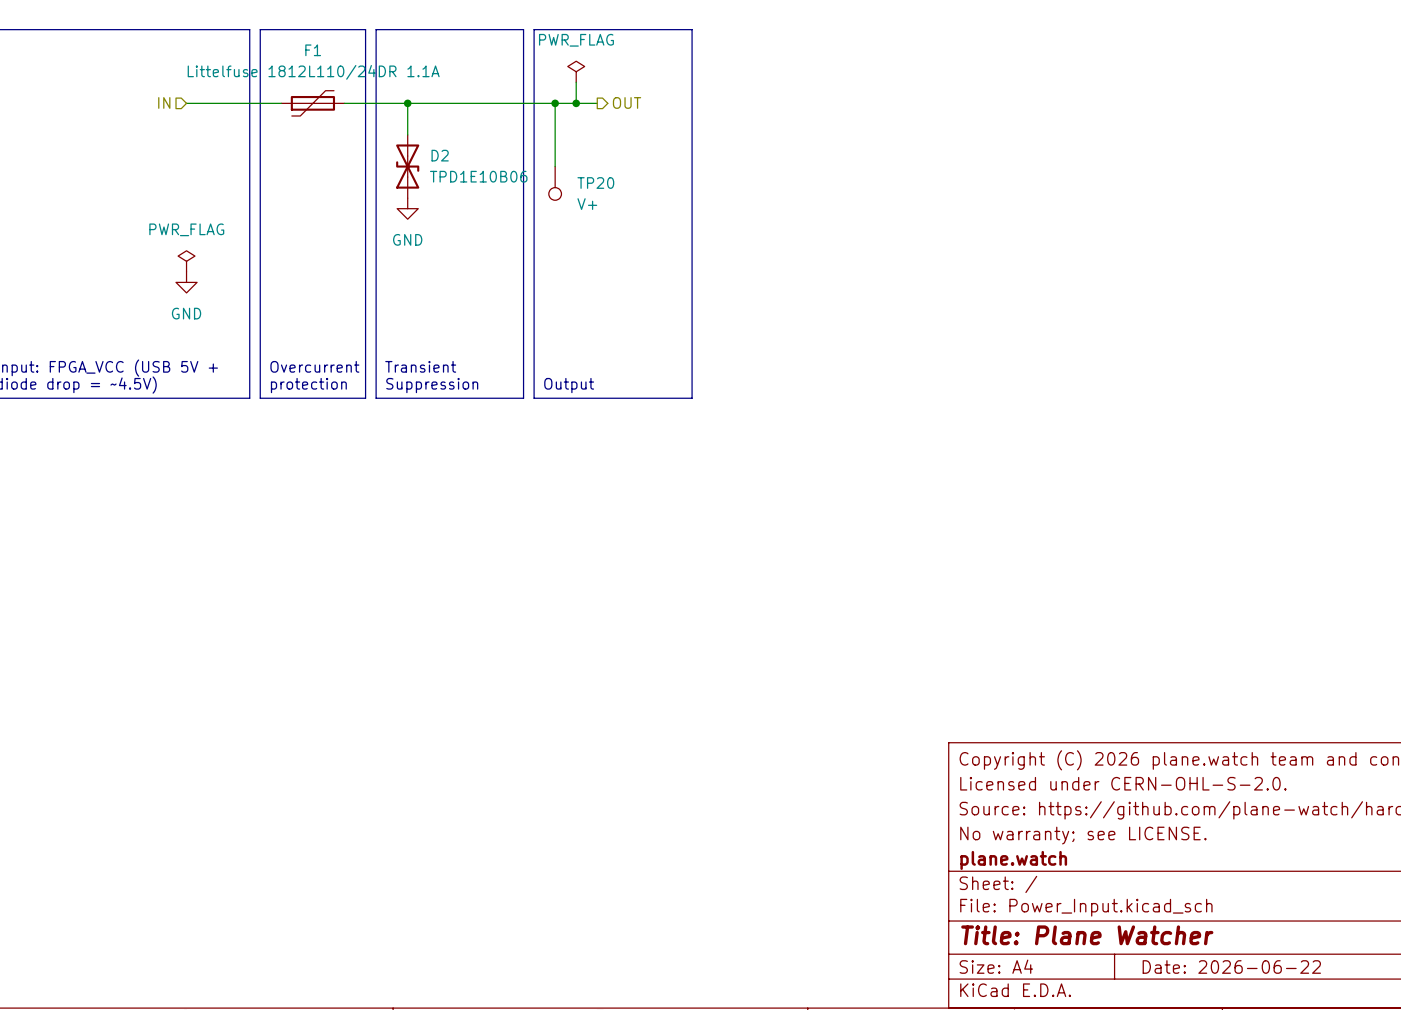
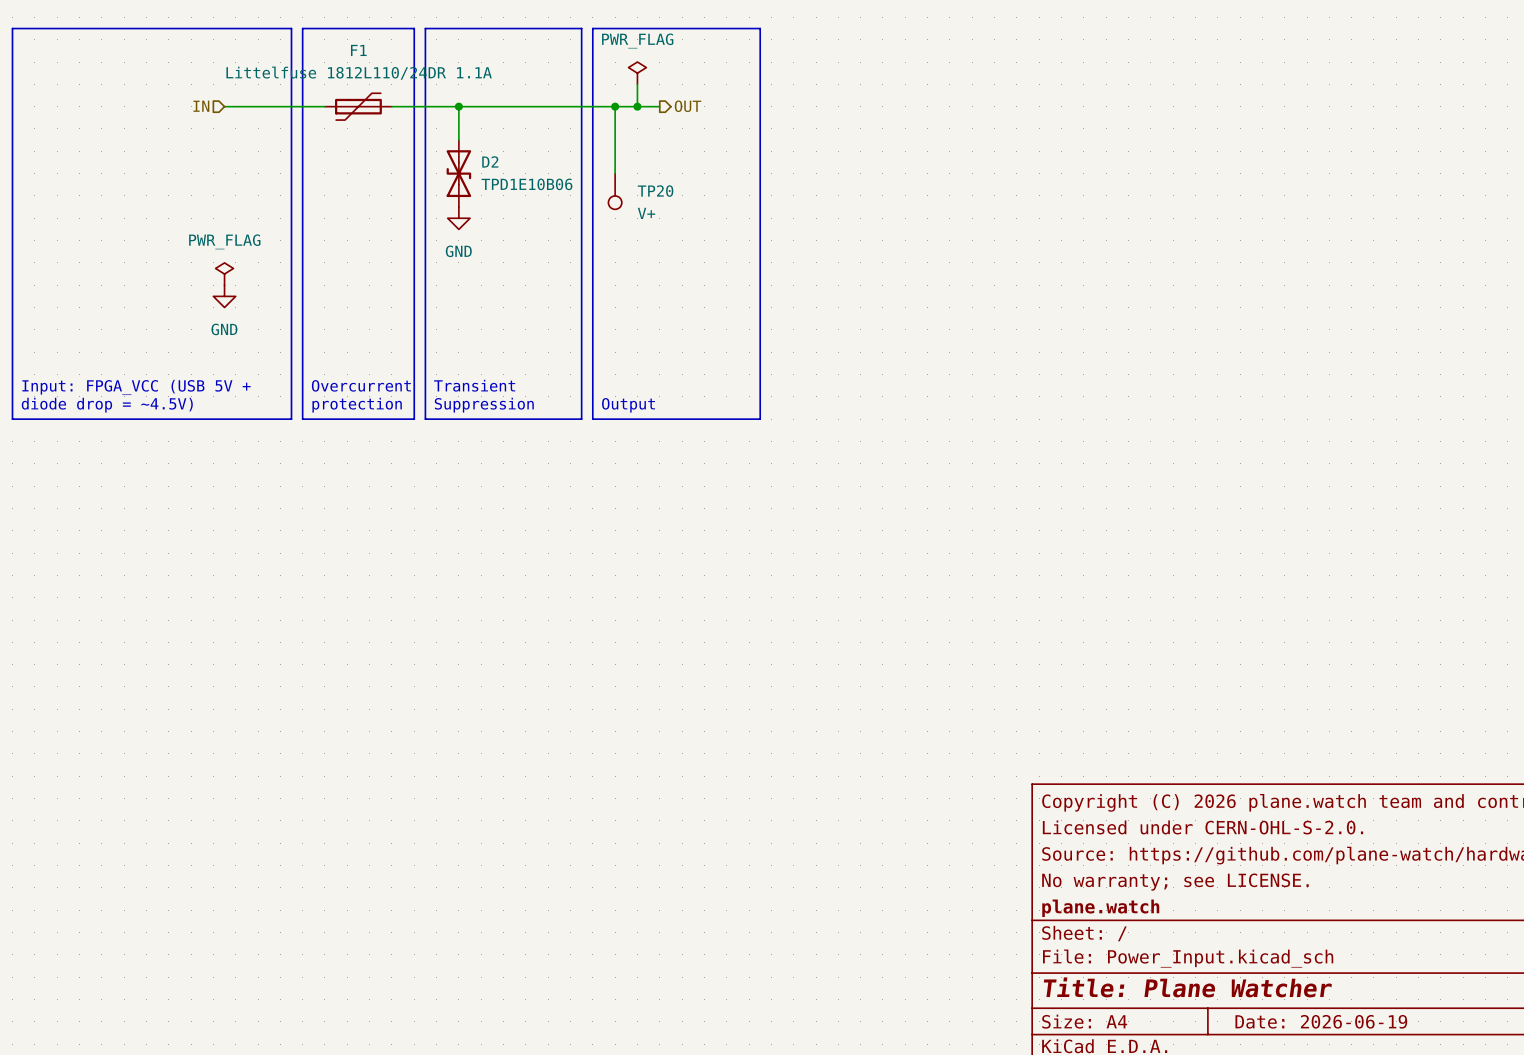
title block: Date: 2026-06-22 (1231, 966) -> Date: 2026-06-19 (1321, 1021)

